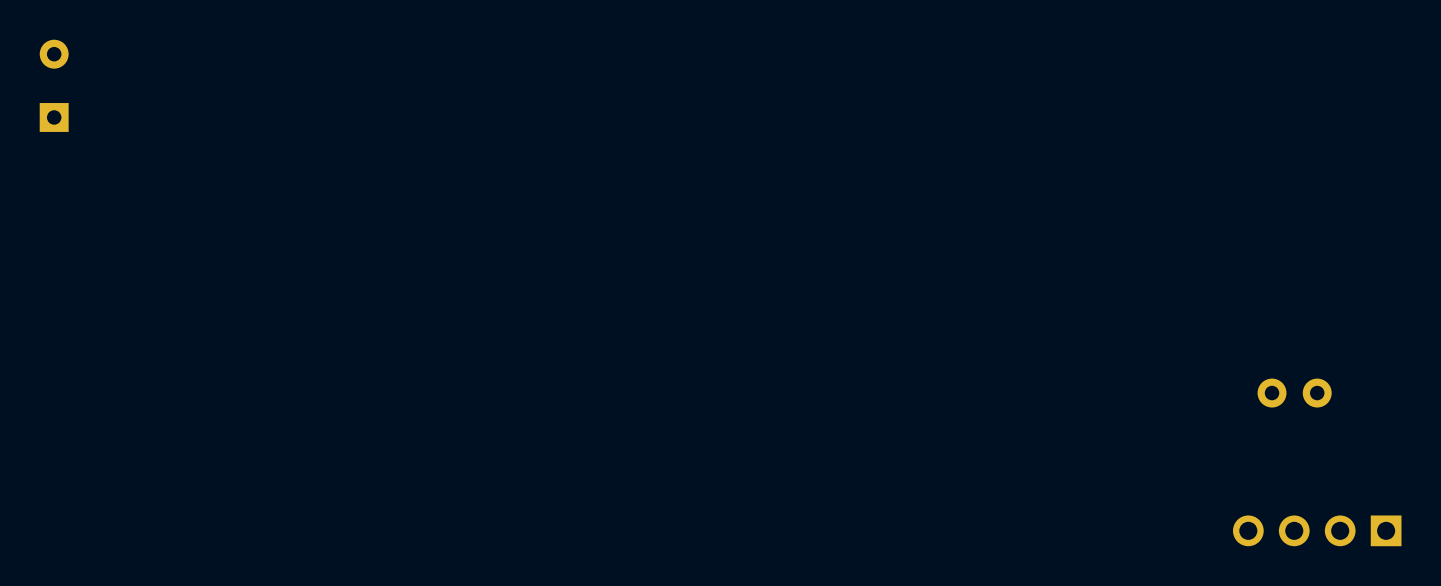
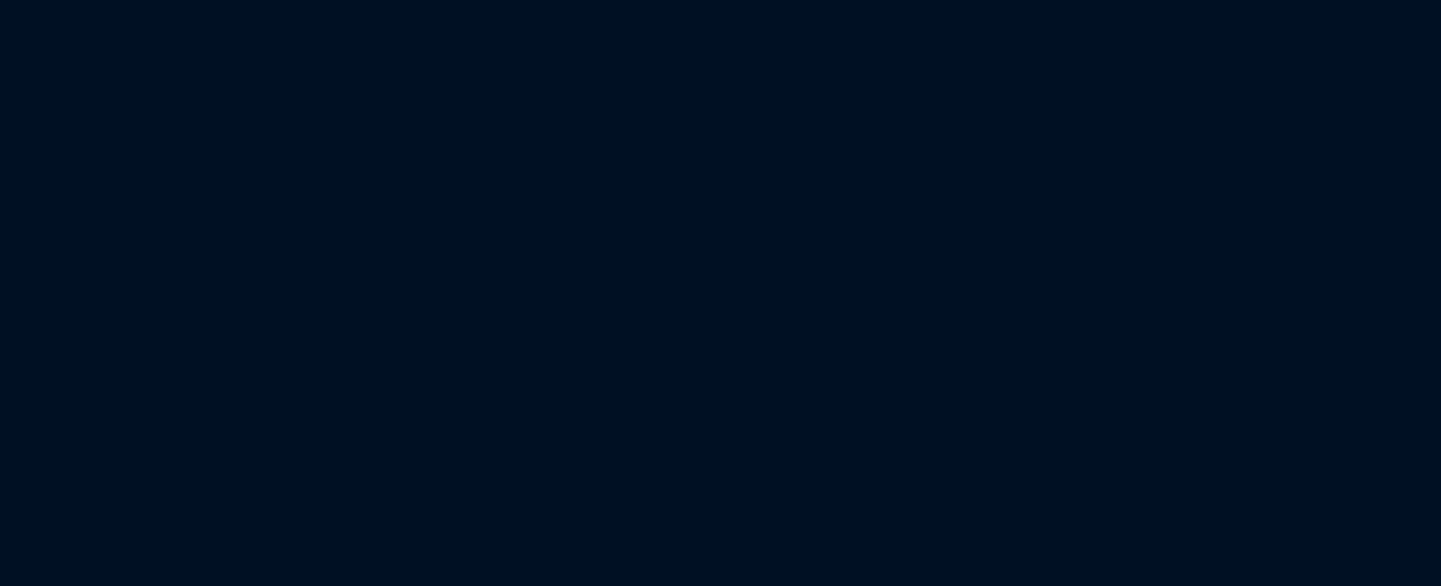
part: (54, 85) -> none
part: (1294, 393) -> none
part: (1317, 530) -> none

